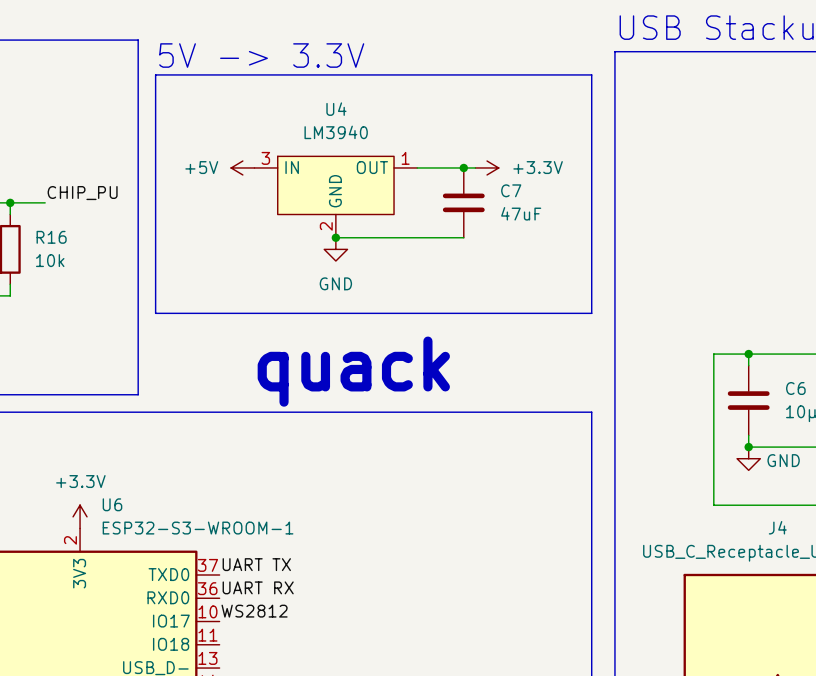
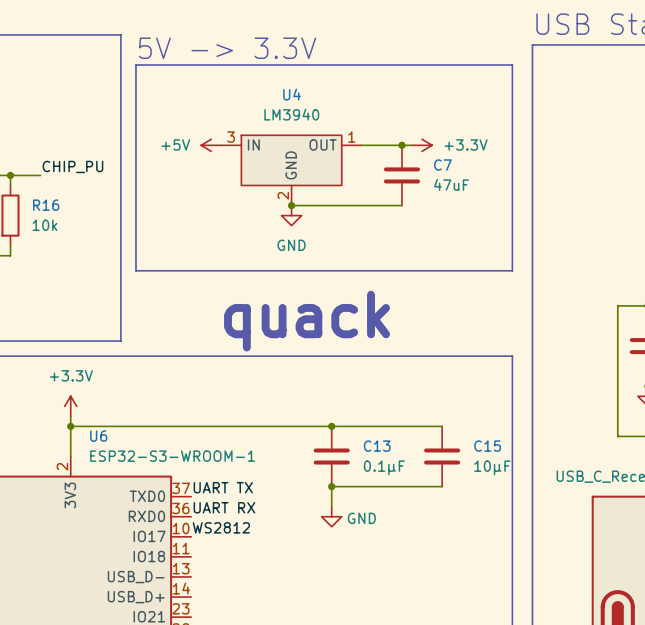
wire: none -> (70, 426) (442, 426)
junction: none -> (70, 426)
junction: none -> (331, 426)
power symbol position: +3.3V (80, 516) -> +3.3V (70, 406)
C13: none -> 0.1µF (331, 456)
C15: none -> 10µF (442, 456)
junction: none -> (331, 486)
wire: none -> (442, 486) (331, 486) (331, 506)
power symbol: none -> GND (331, 516)

